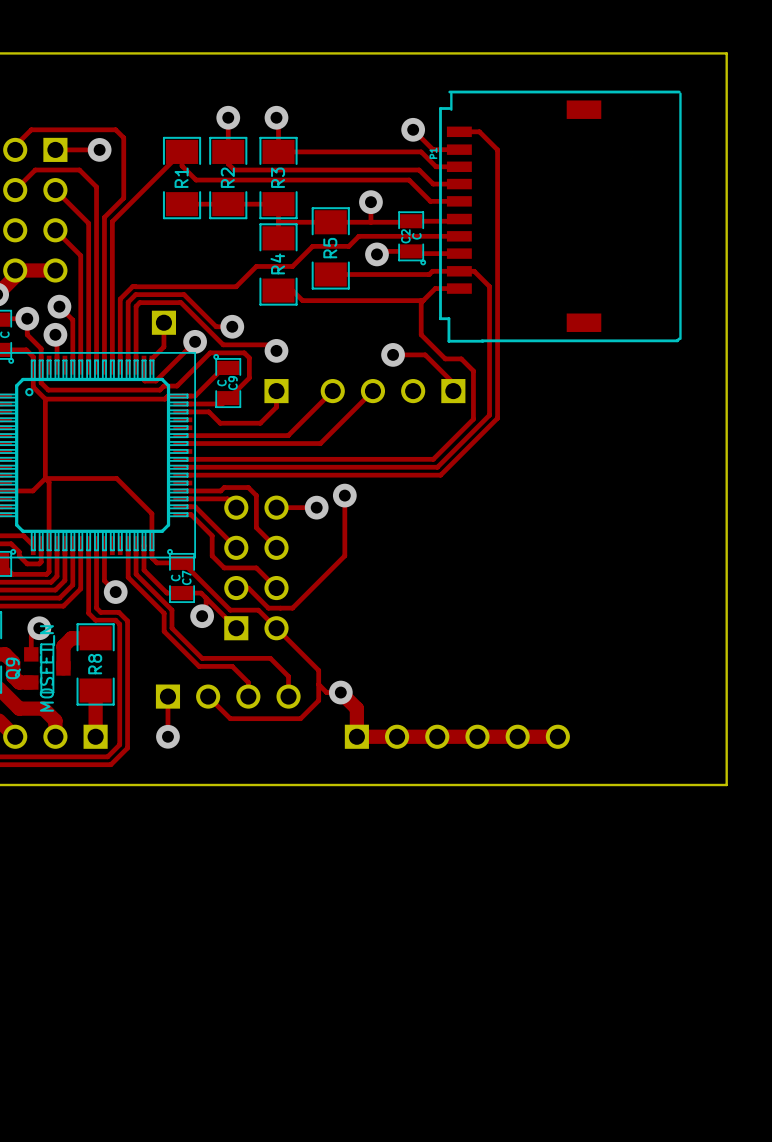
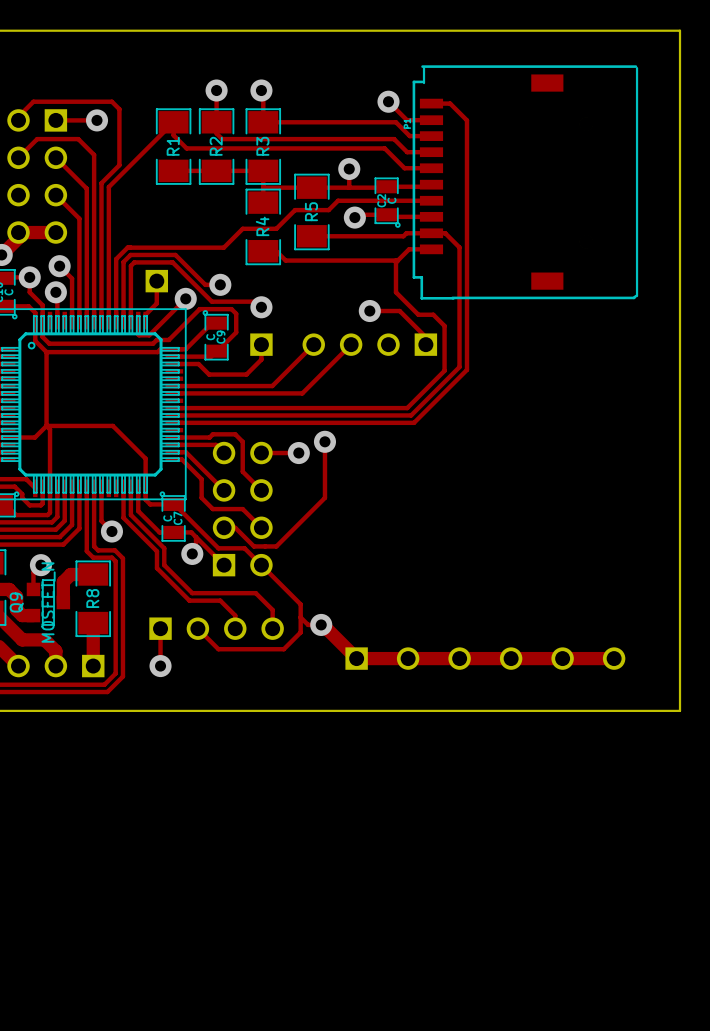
track: (340, 692) (356, 708) (356, 736) (557, 736) -> (321, 624) (356, 658) (614, 658)
part: none -> (485, 658)
part: (457, 736) -> none

